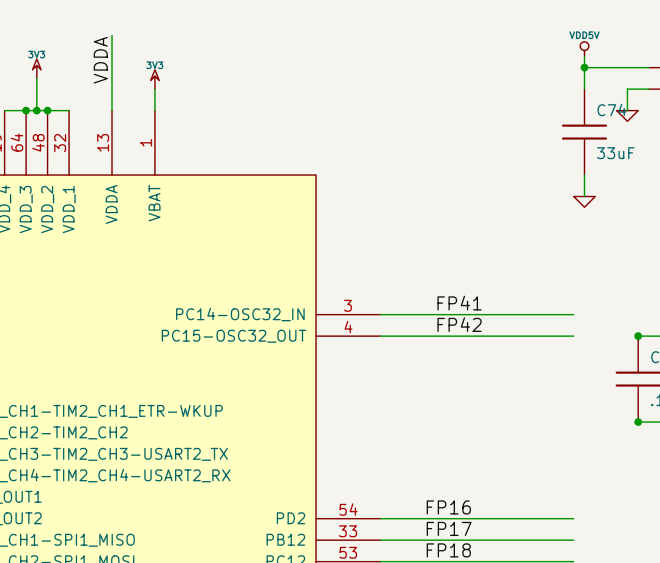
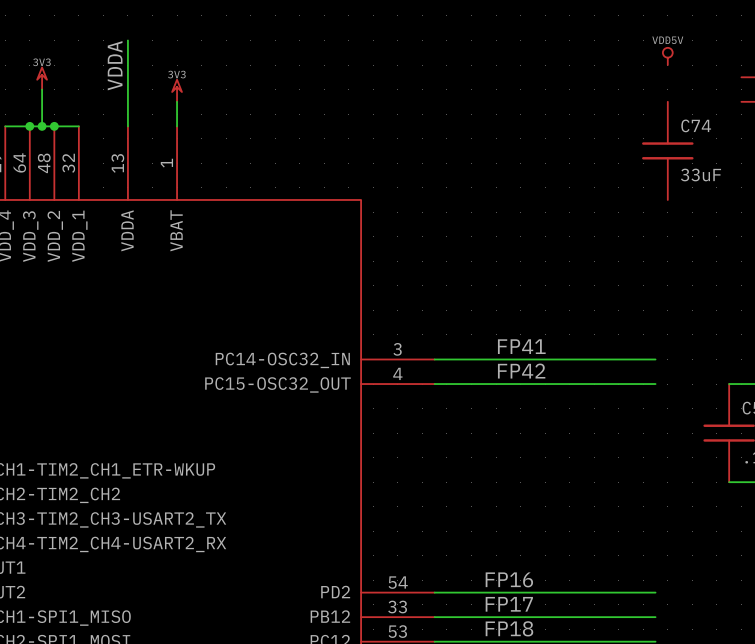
wire: (584, 56) (584, 89) -> none
wire: (584, 67) (648, 67) -> none
junction: (584, 67) -> none
wire: (648, 89) (627, 89) (627, 110) -> none
power symbol: (627, 115) -> none
wire: (584, 175) (584, 196) -> none
power symbol: (584, 201) -> none
junction: (638, 336) -> none
junction: (638, 422) -> none

